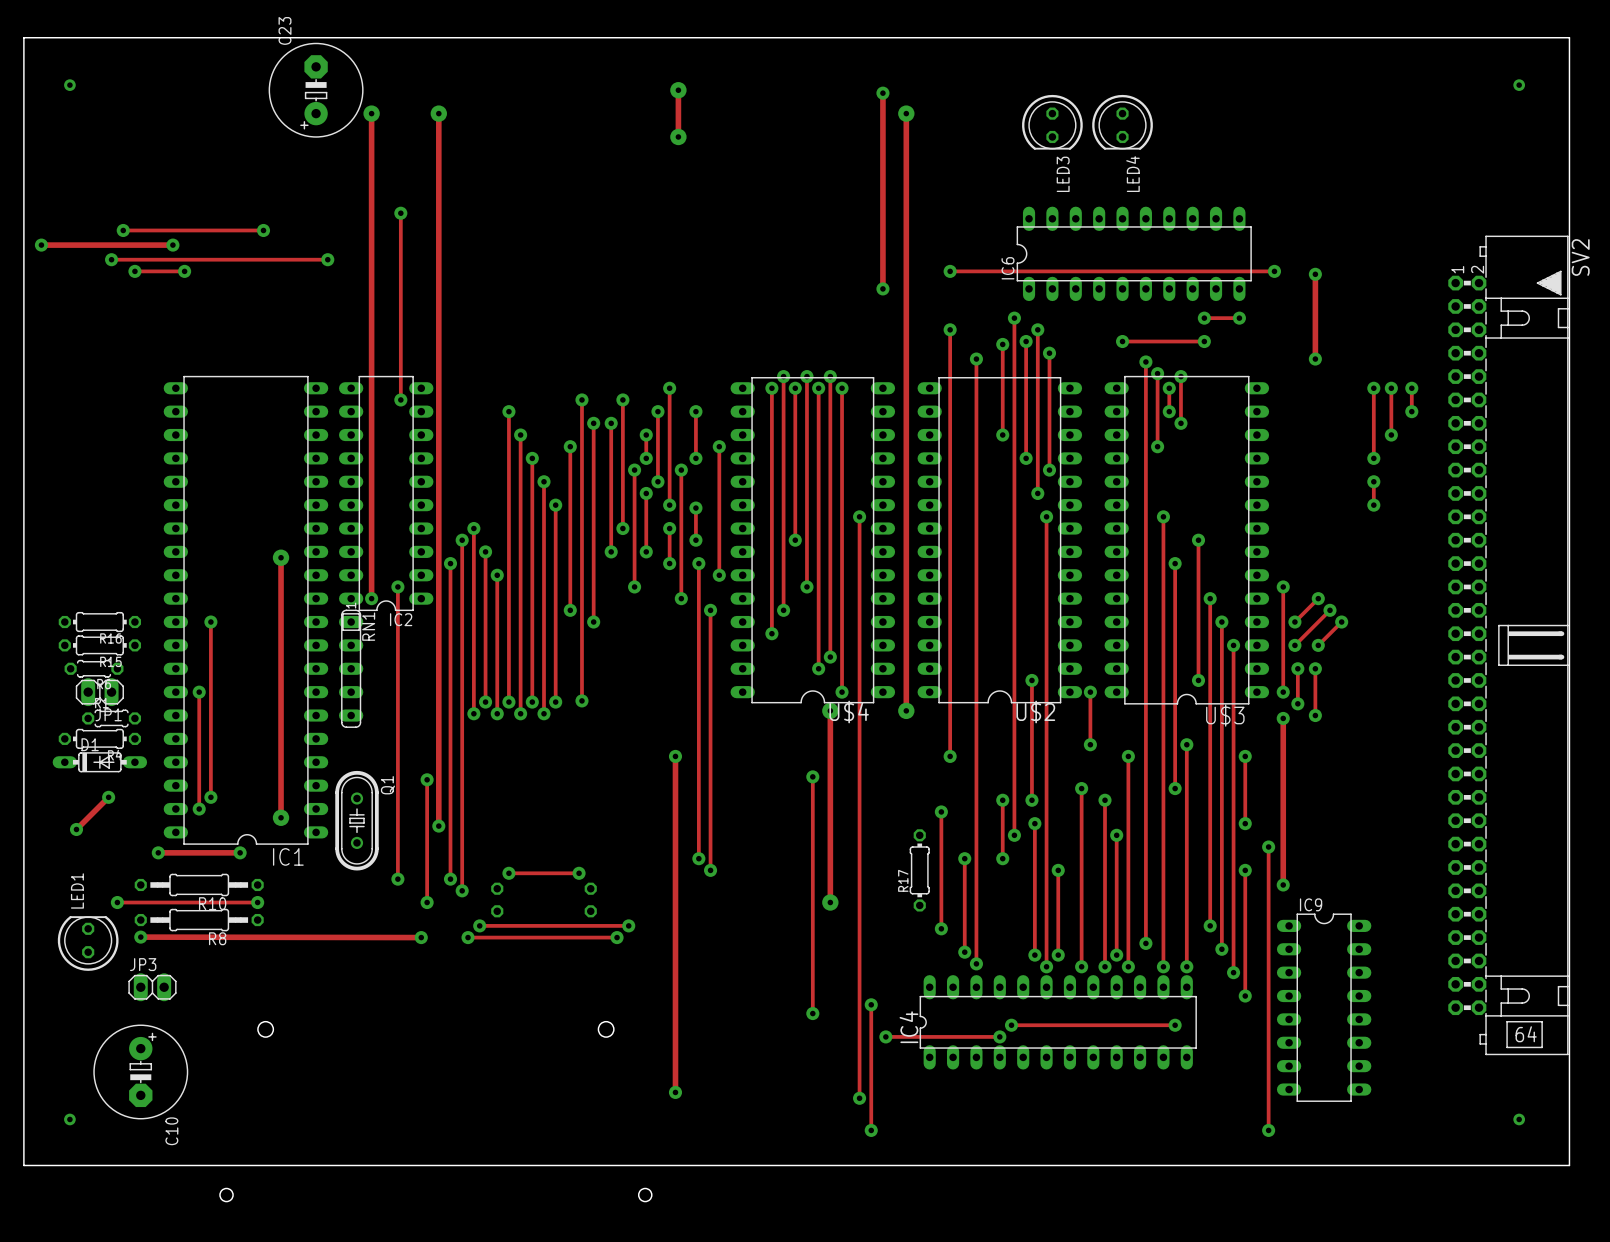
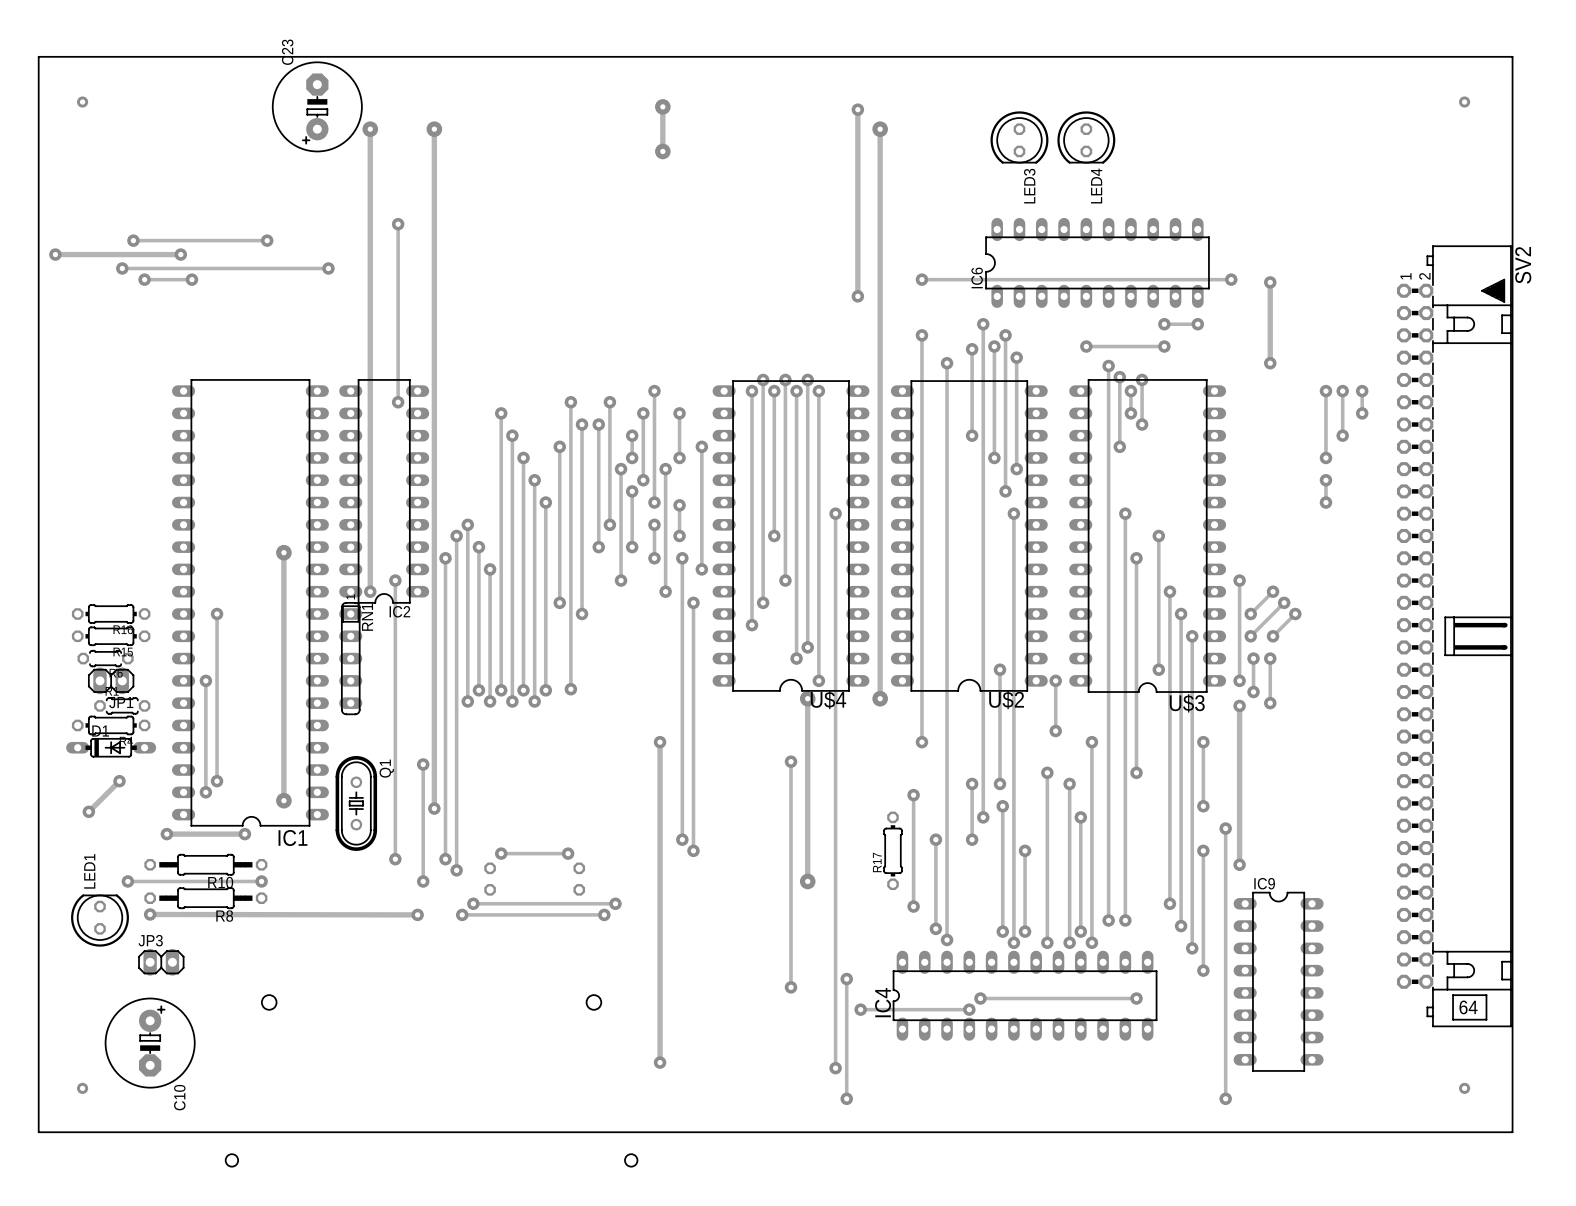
track: (1186, 744) (1186, 966) -> none
via: (1186, 744) -> none
track: (1163, 943) (1163, 966) -> none
via: none -> (1125, 920)
via: (1163, 966) -> none
via: (1186, 966) -> none

